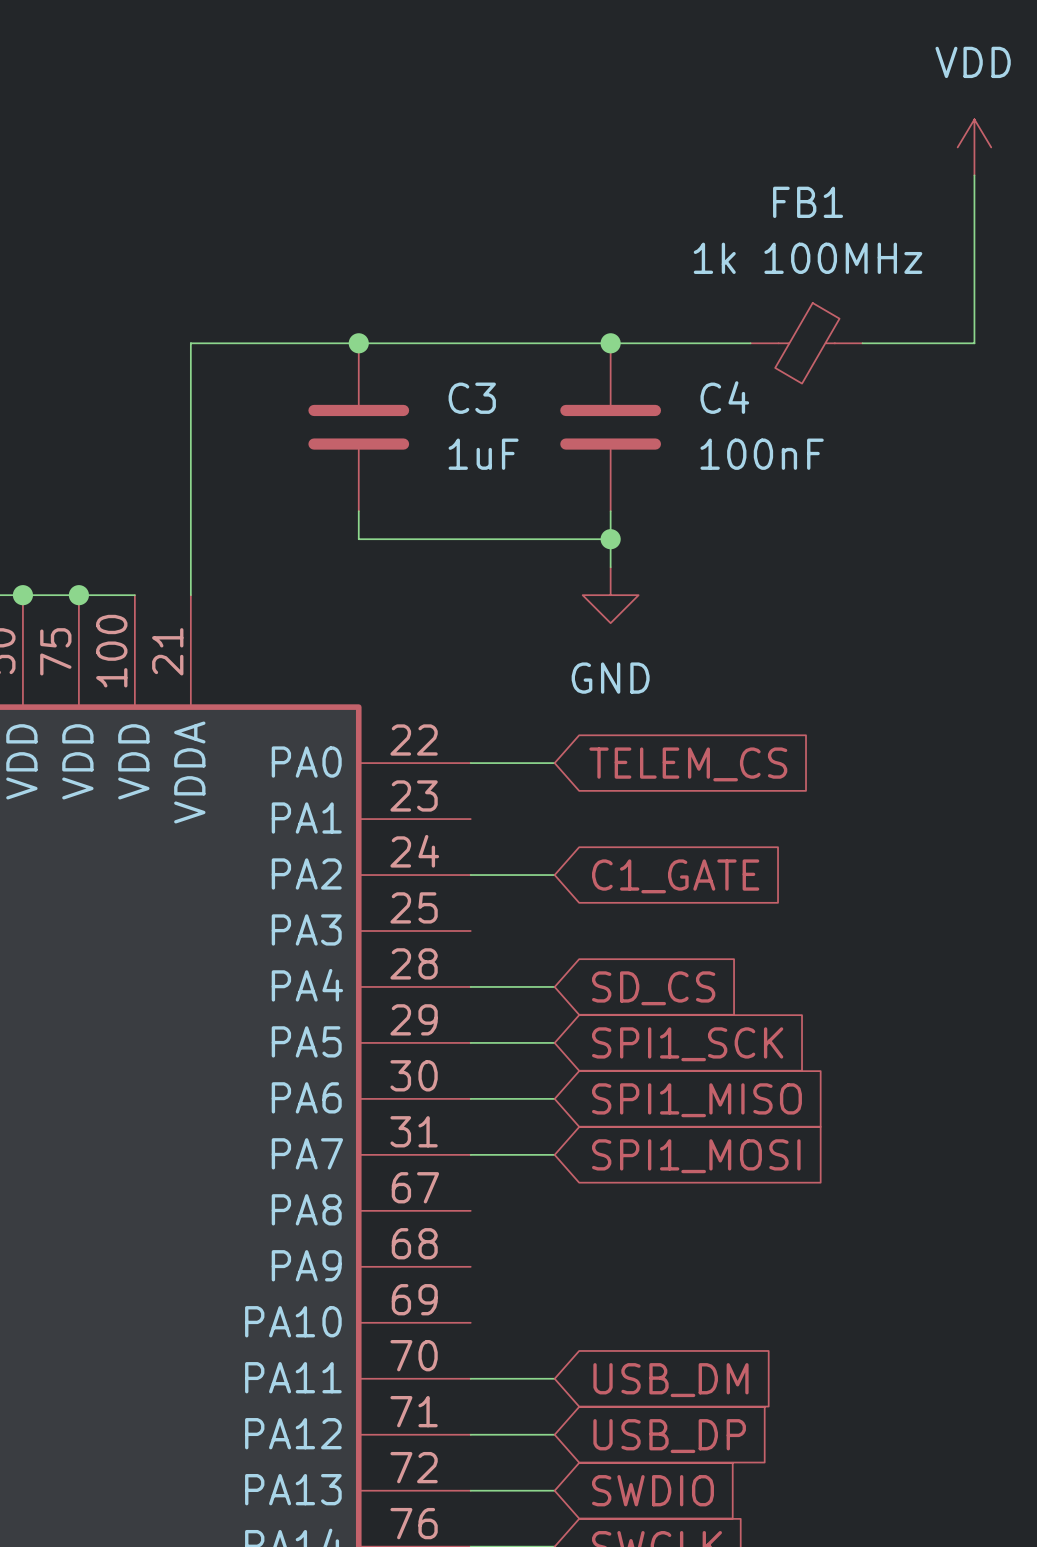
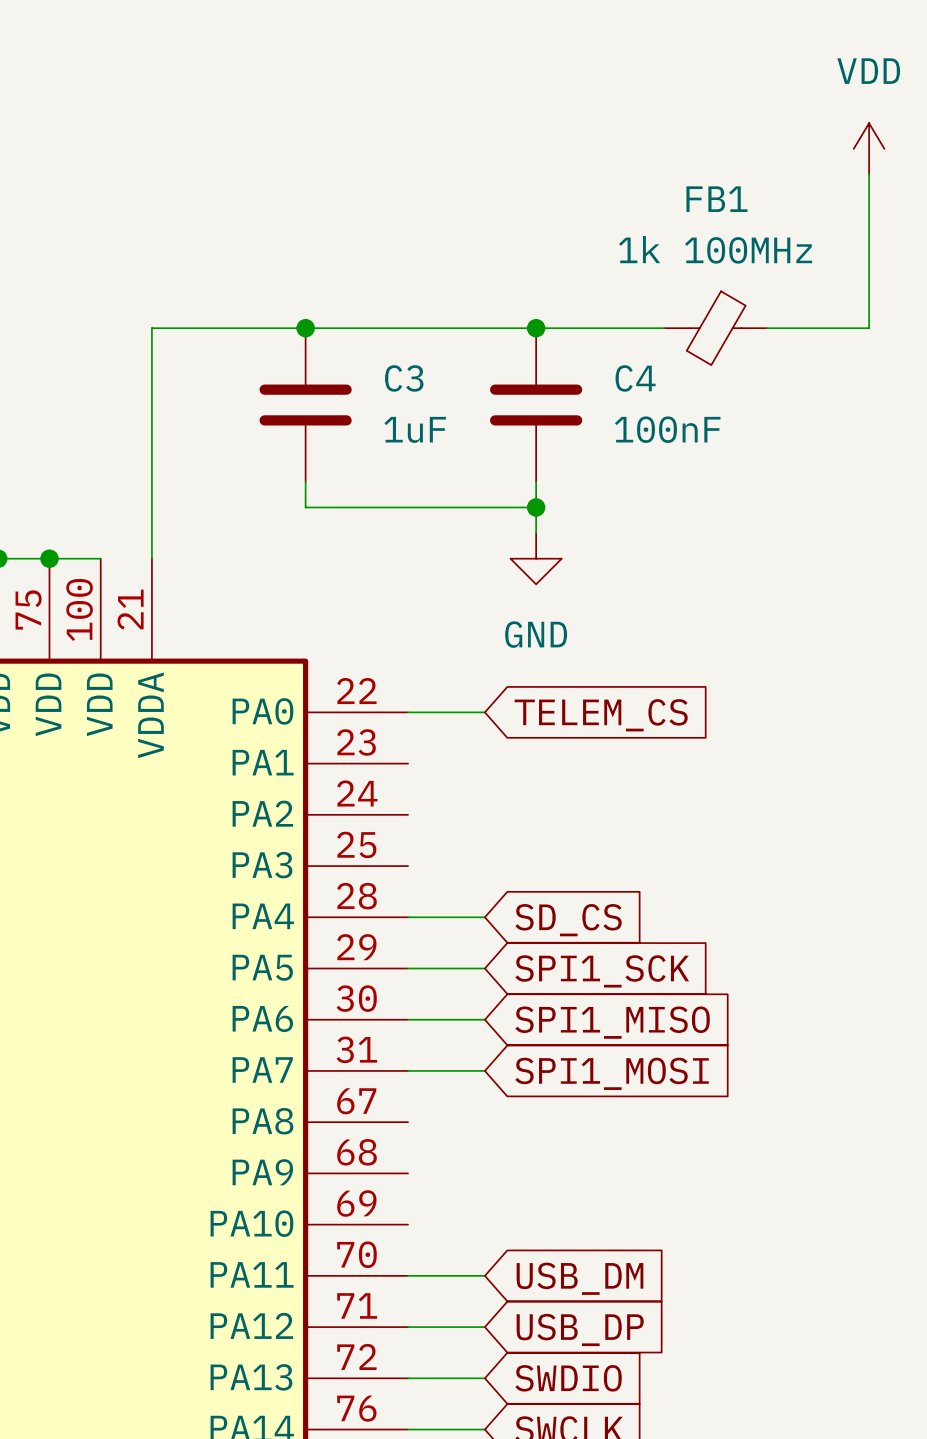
wire: (470, 875) (554, 875) -> none
global label: C1_GATE (675, 876) -> none

